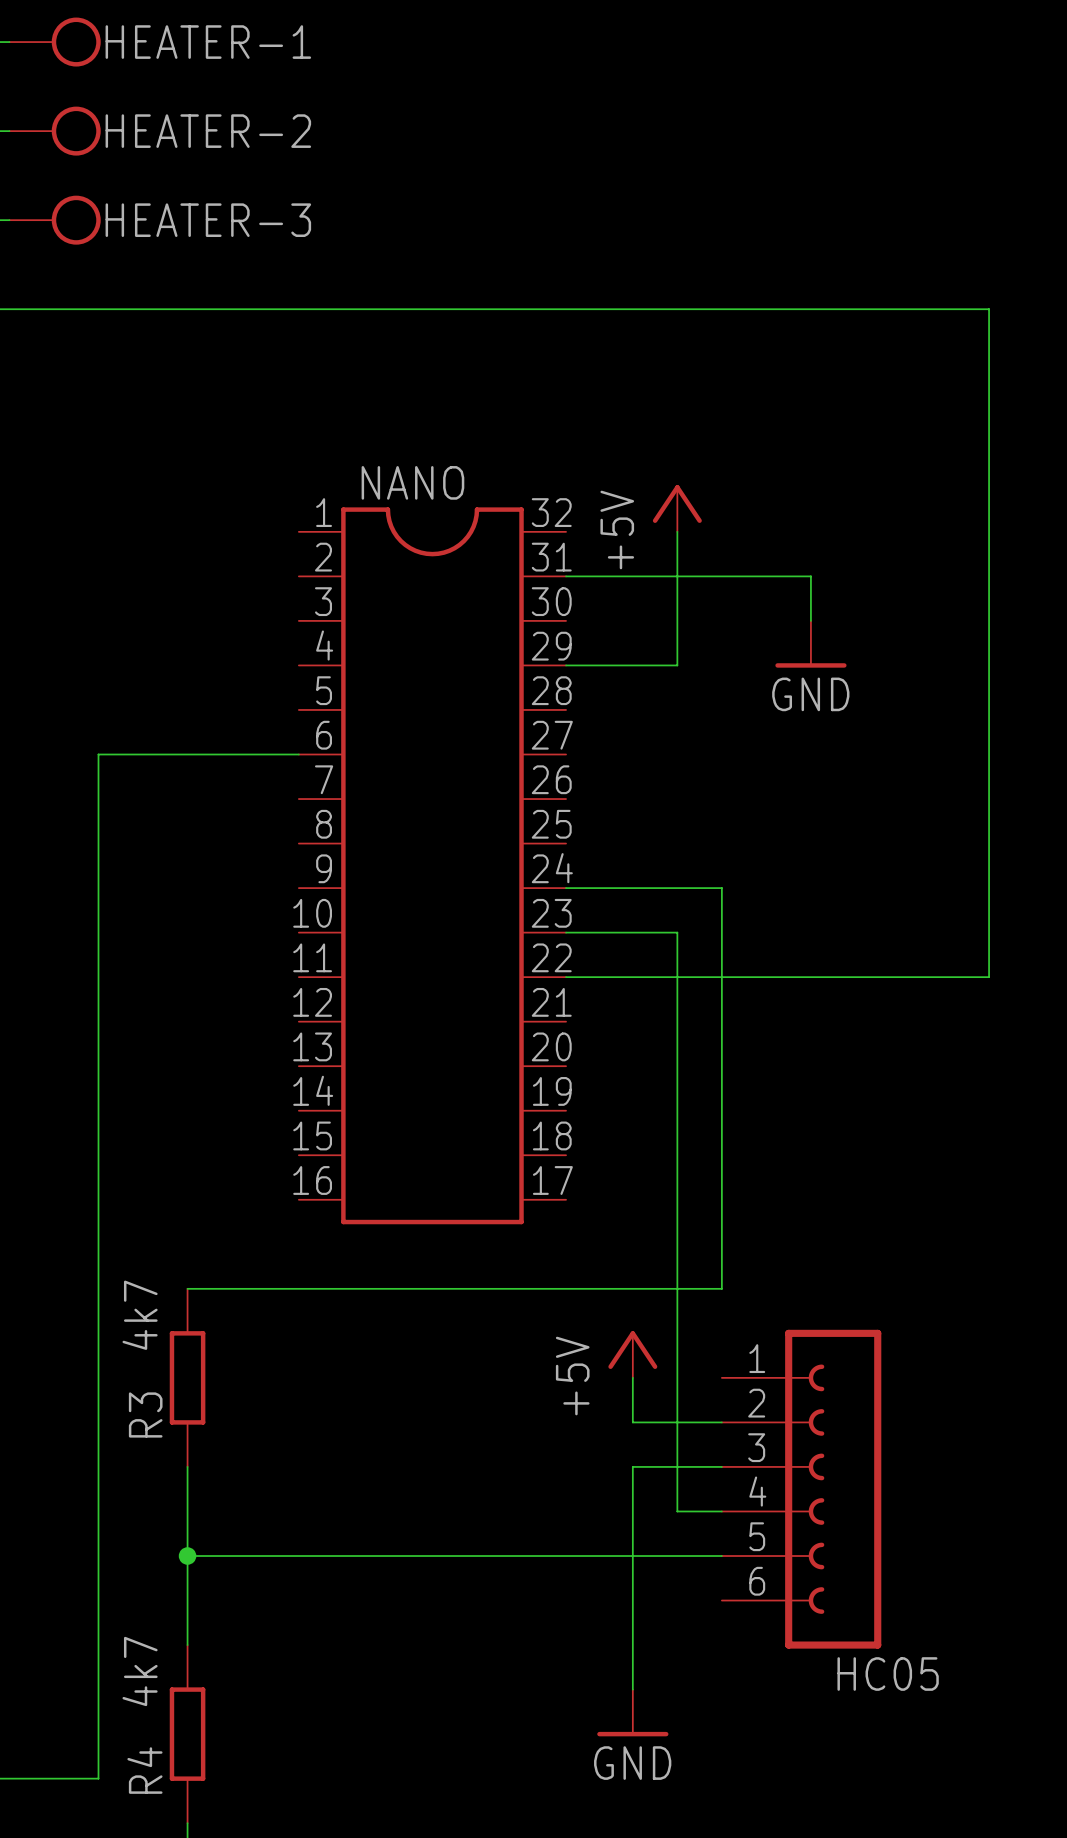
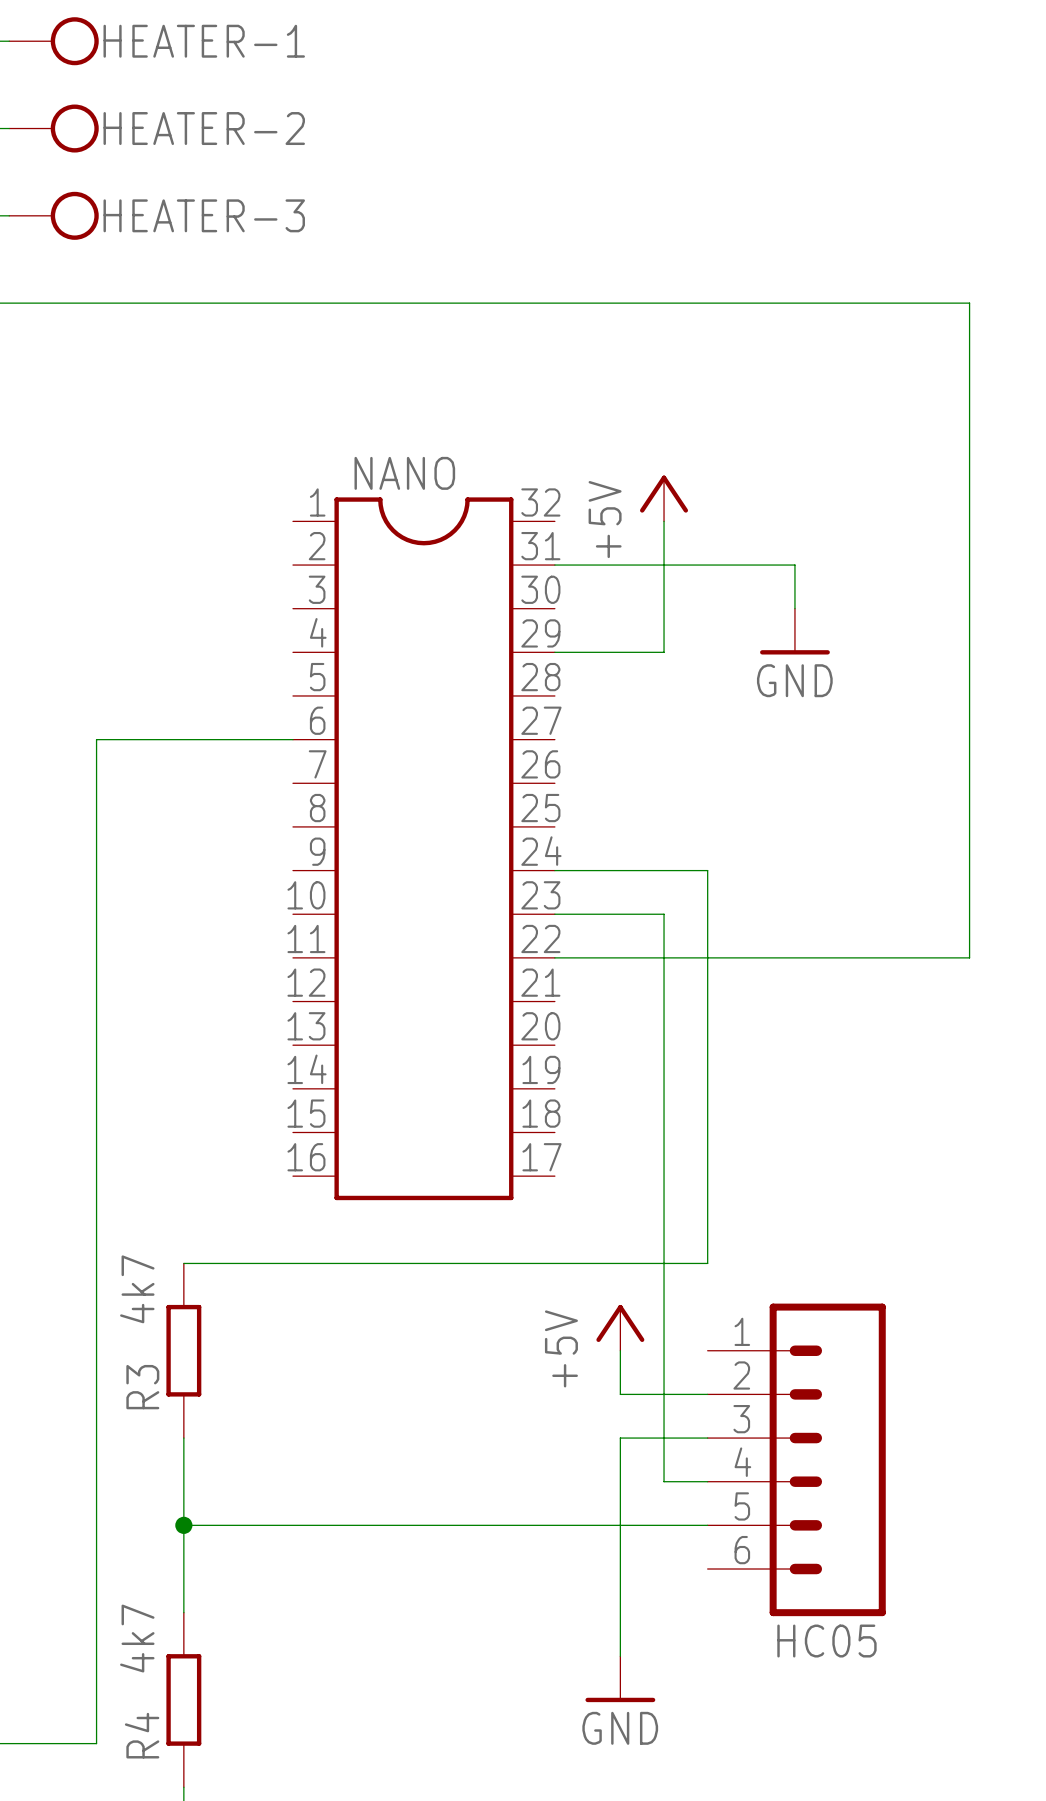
HC05 symbol: [721, 1329, 882, 1649] -> [707, 1303, 886, 1617]
HC05 name position: HC05 (888, 1674) -> HC05 (826, 1641)

